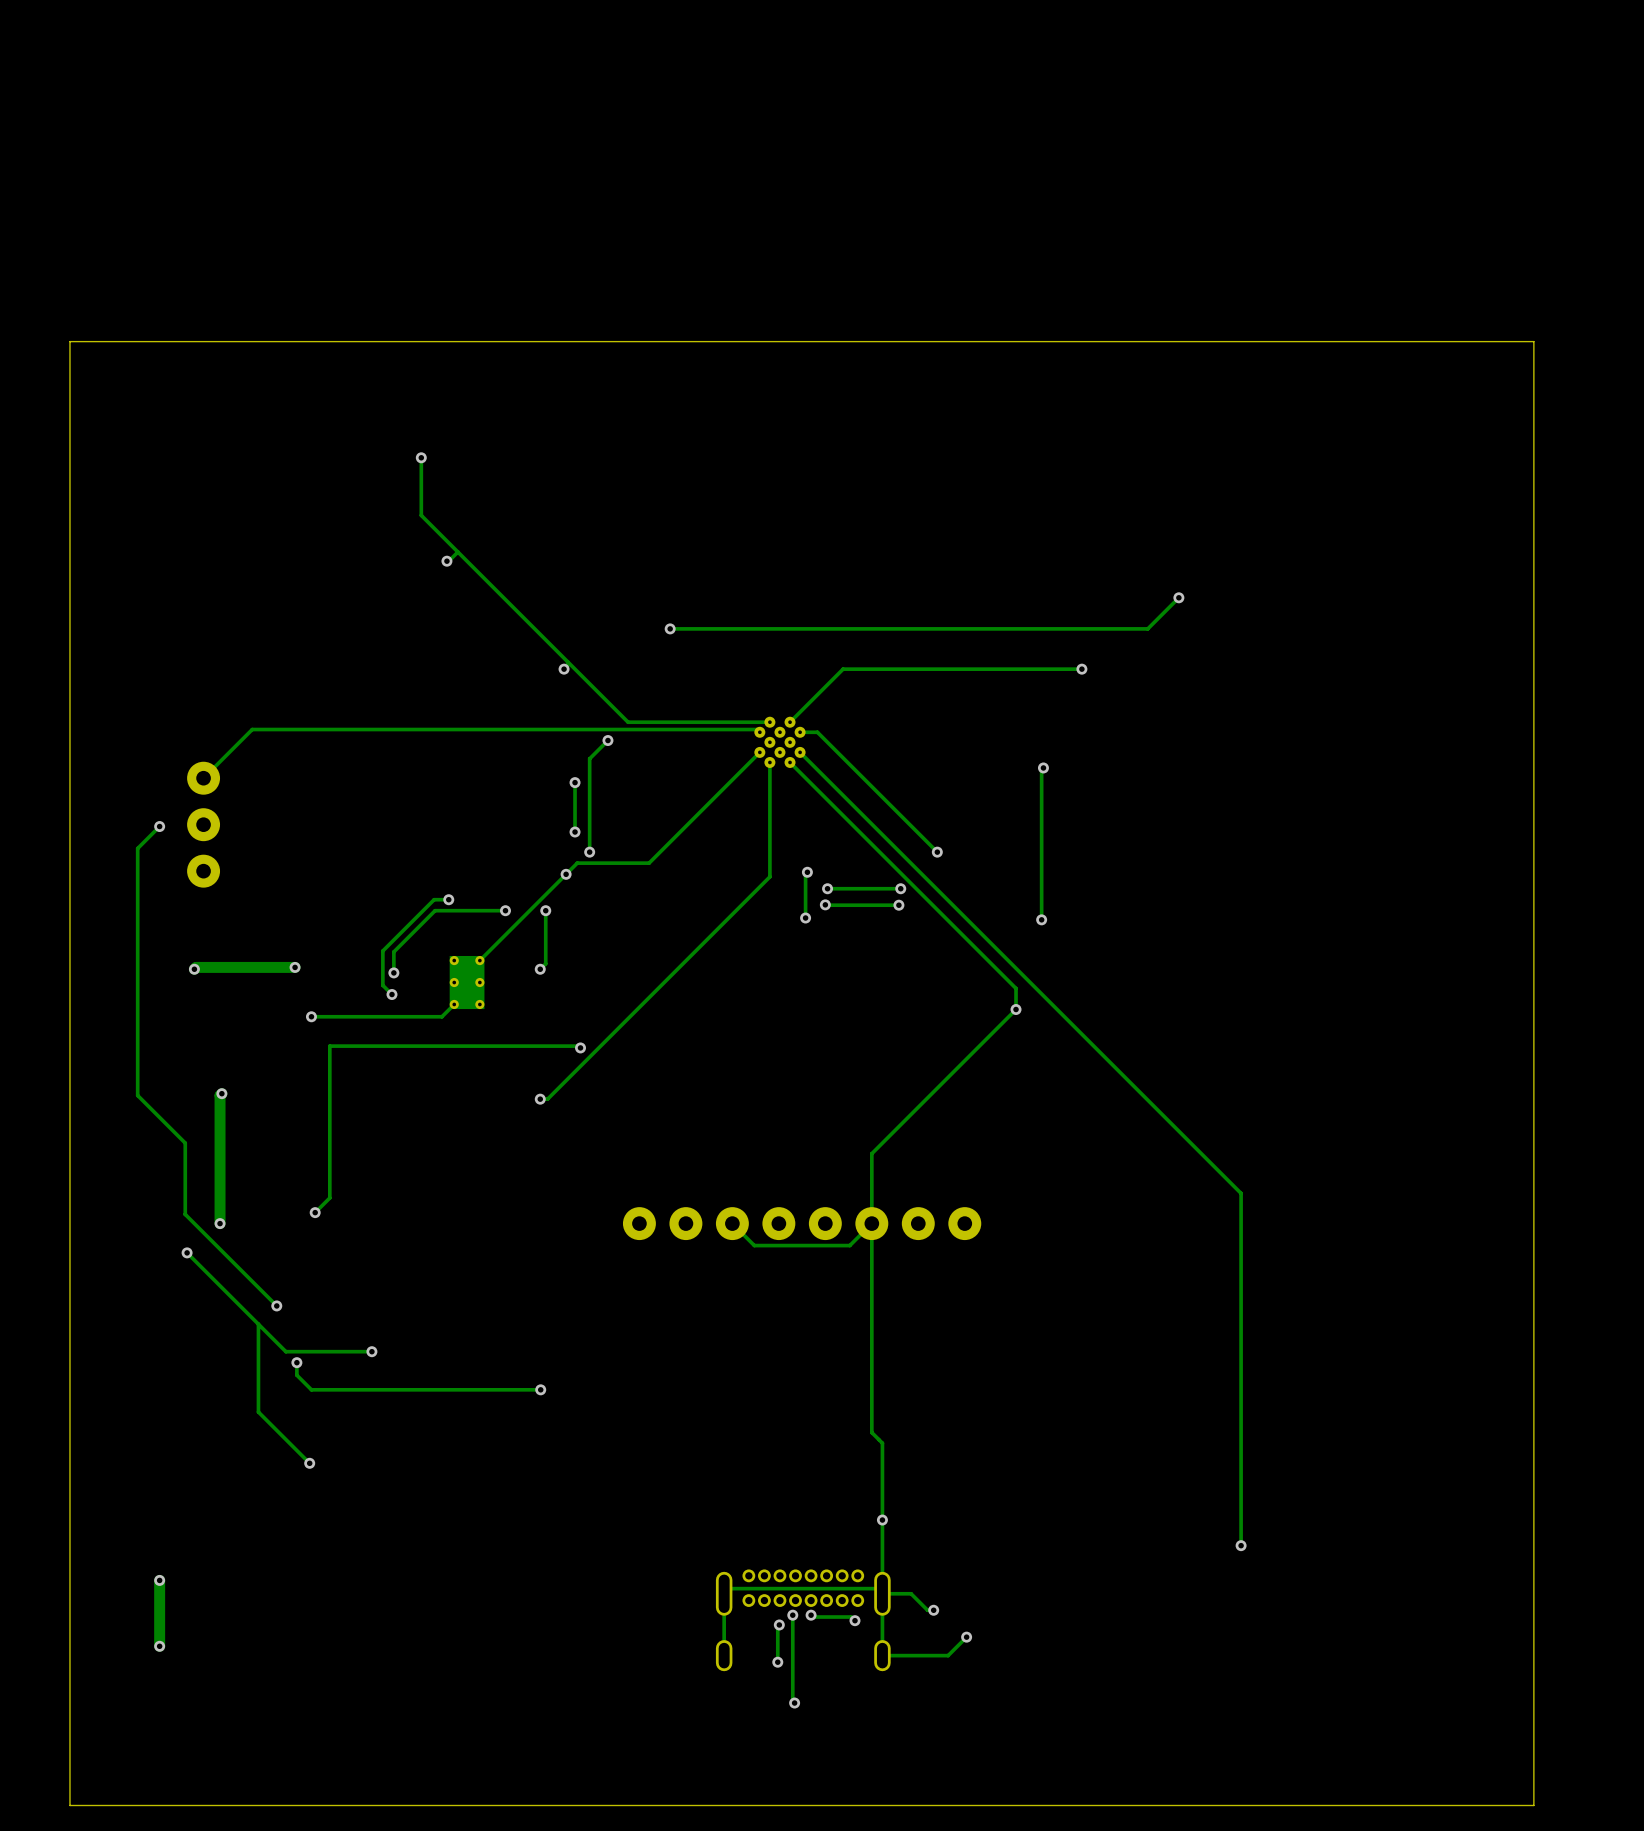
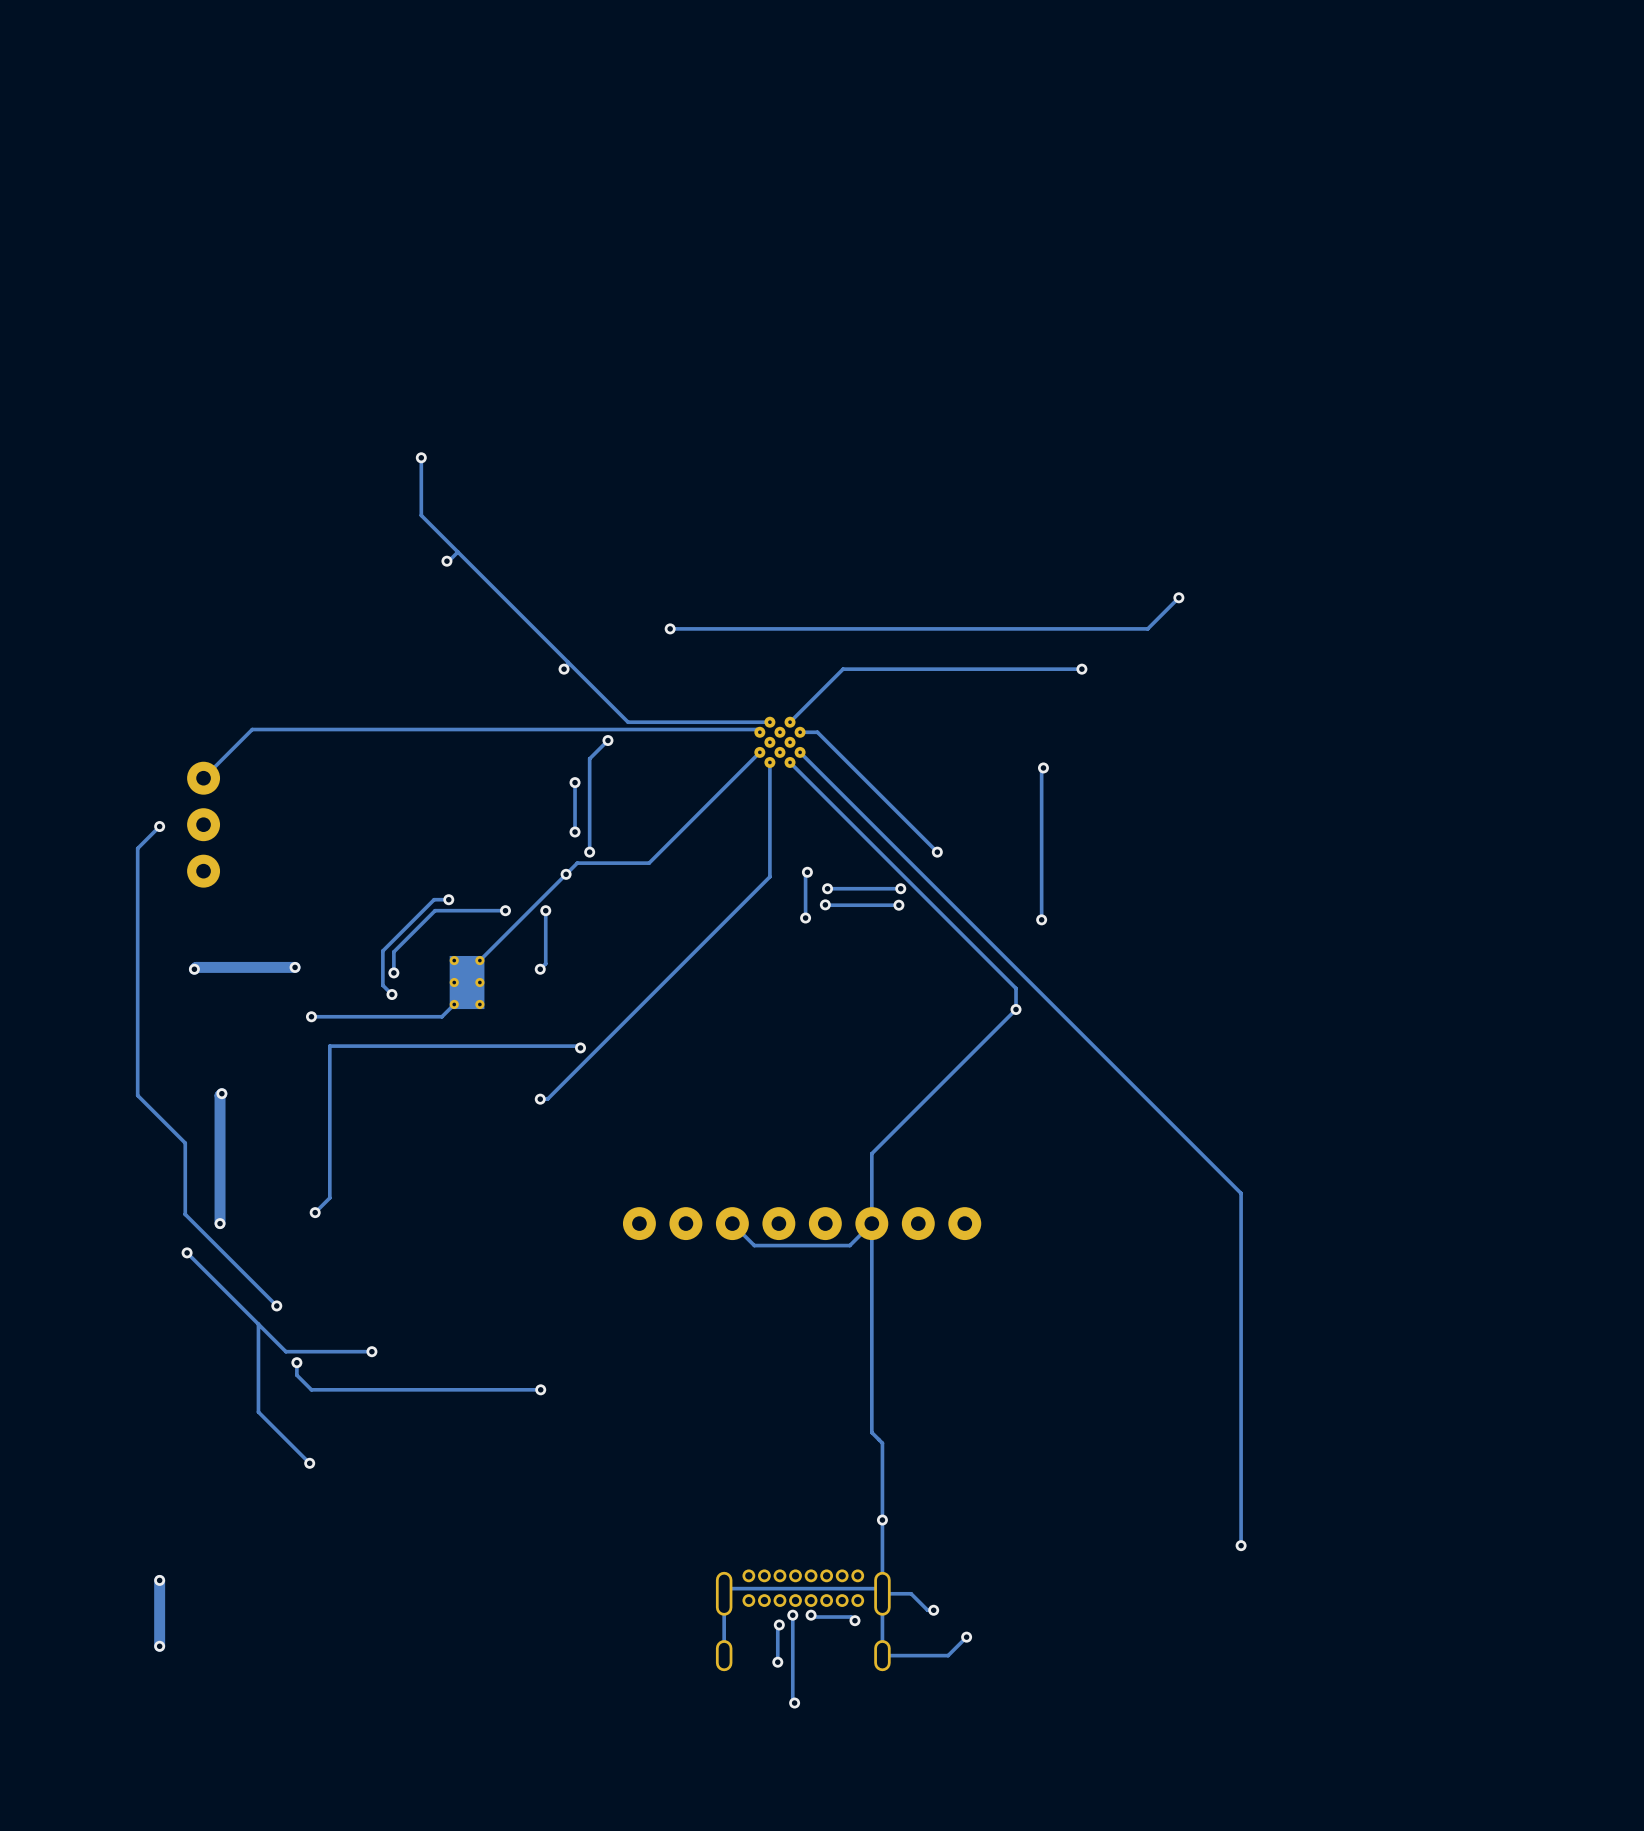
board edge: (1533, 341) (69, 341) (69, 1805) (1533, 1805) (1533, 341) -> none

